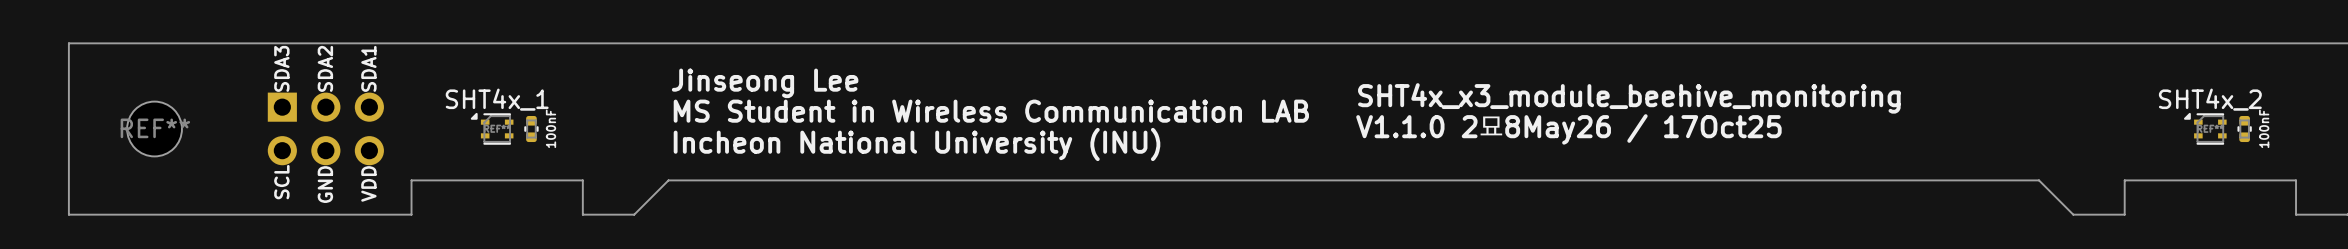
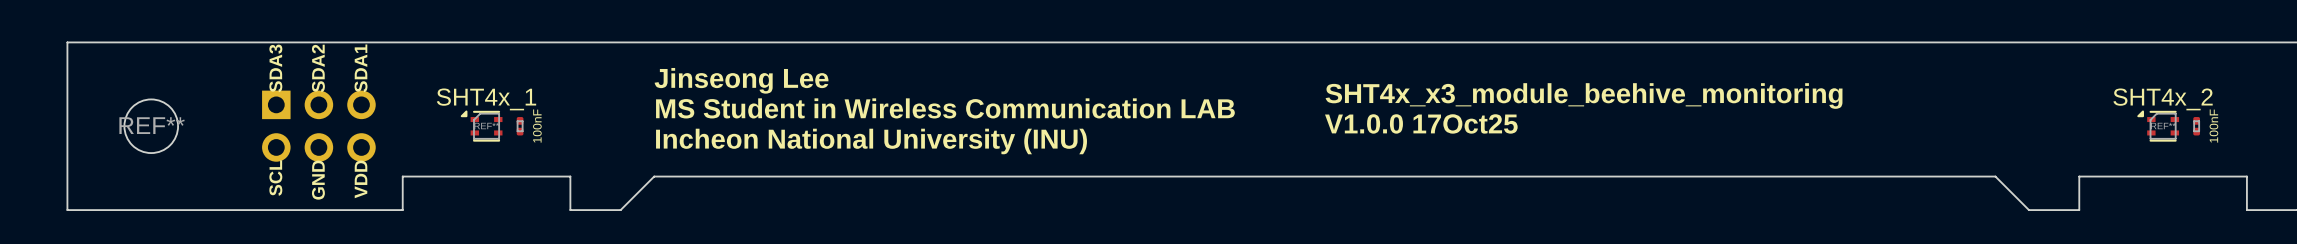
100nF footprint: [524, 115, 539, 143] -> [516, 117, 524, 136]
100nF footprint: [2237, 115, 2252, 143] -> [2193, 117, 2200, 136]
text: V1.1.0 2묘8May26 / 17Oct25 (1568, 129) -> V1.0.0 17Oct25 (1421, 123)

